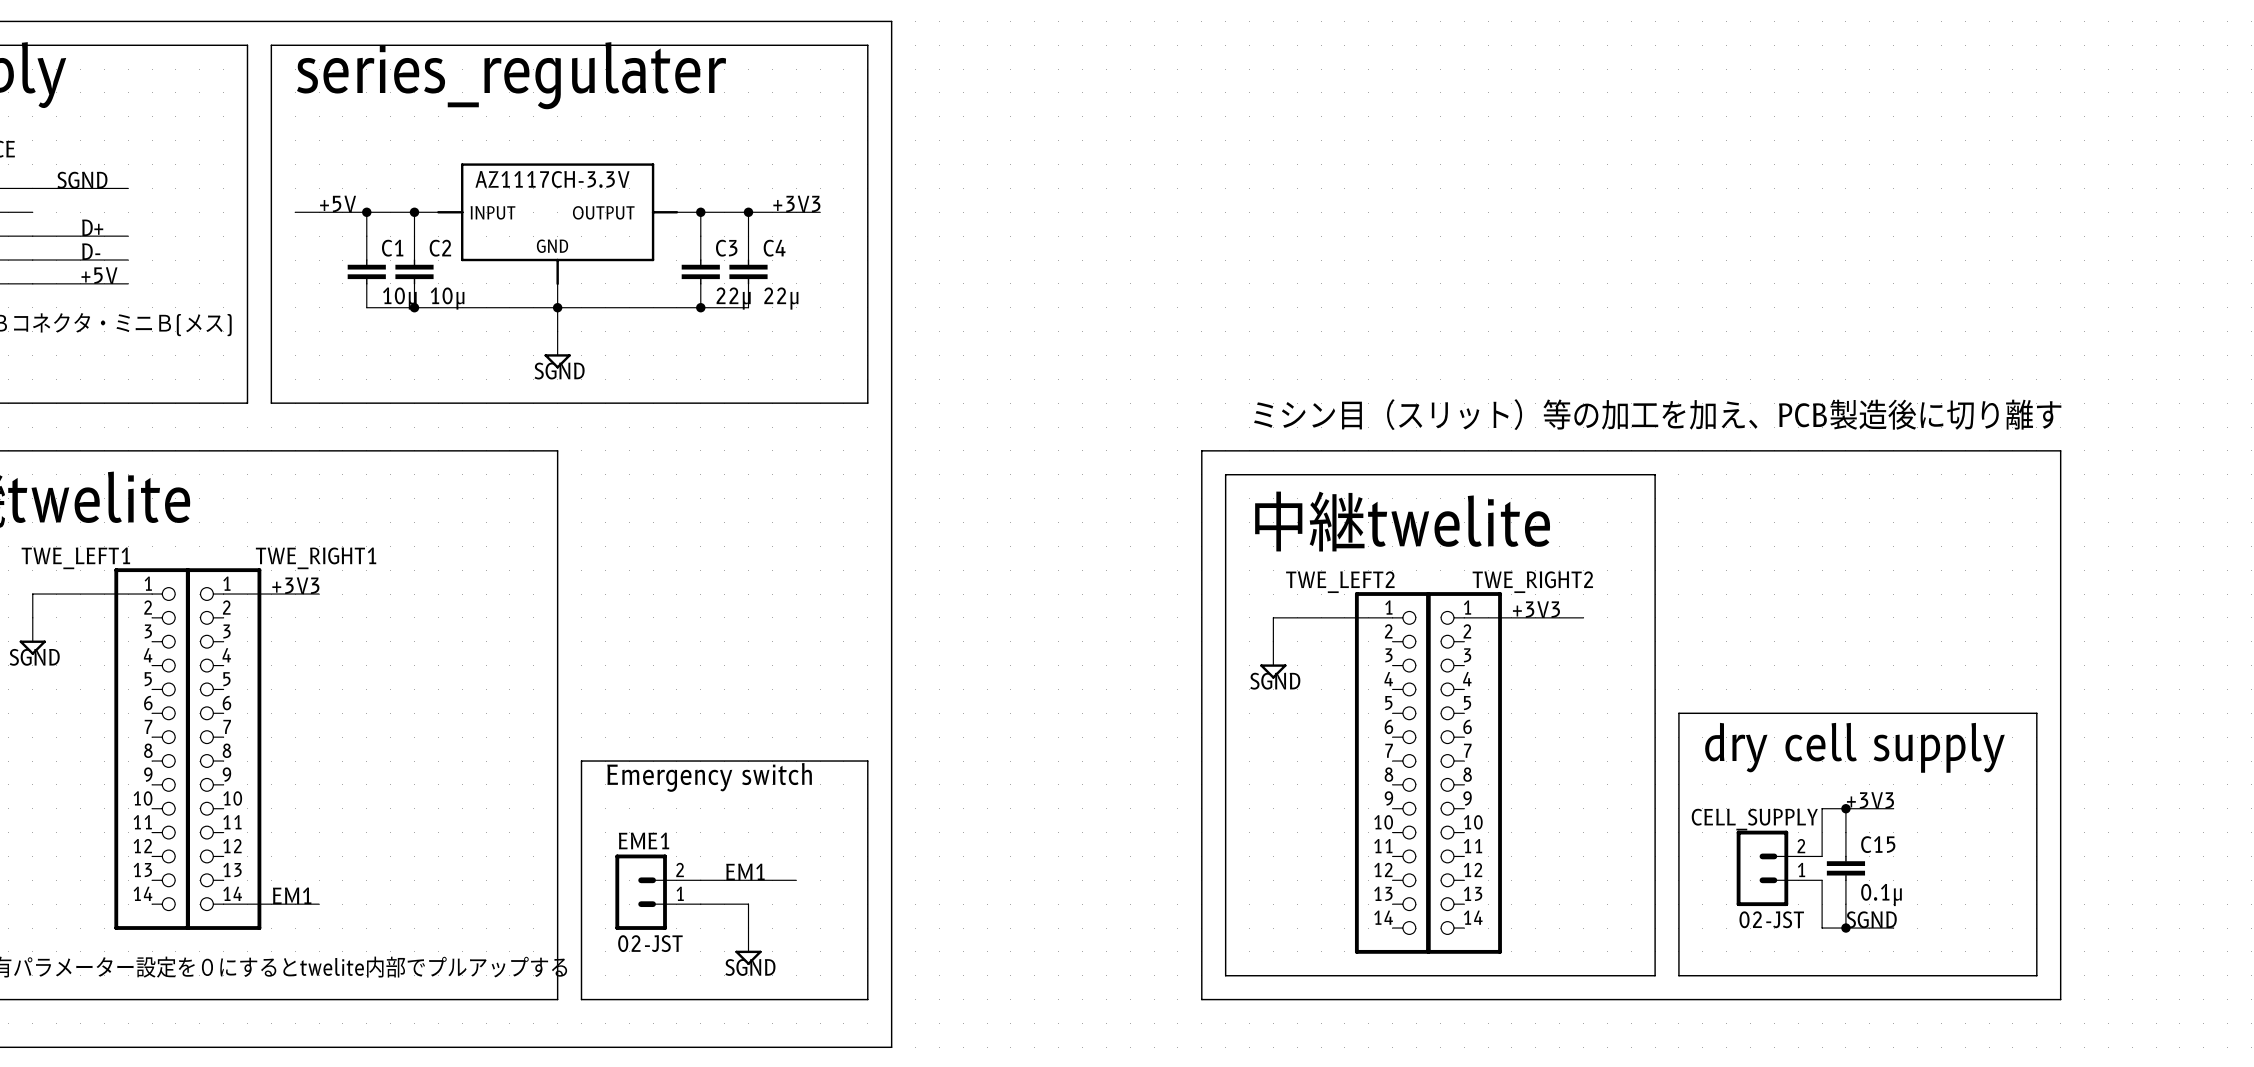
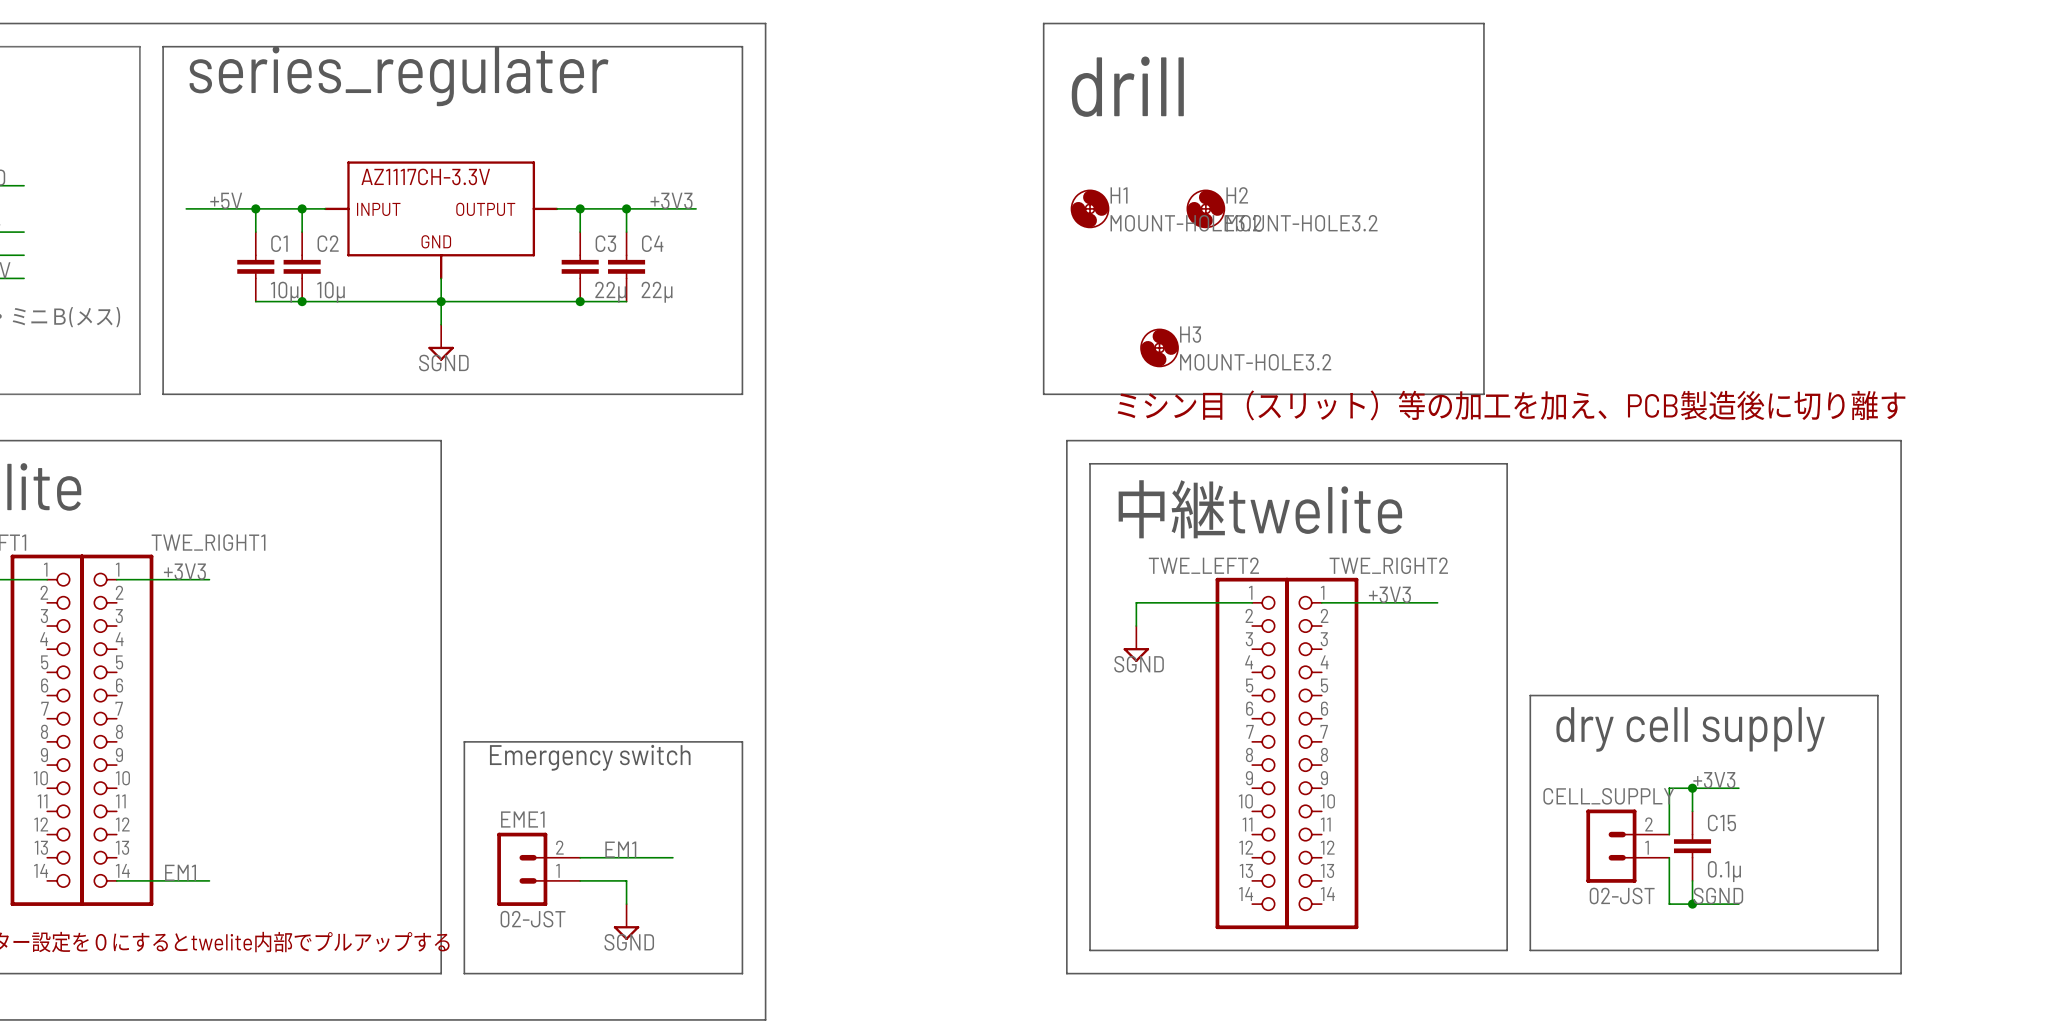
line: none -> (1043, 23) (1043, 394) (1483, 394) (1483, 23) (1043, 23)
text: none -> drill (1127, 86)
H1: none -> MOUNT-HOLE3.2 (1090, 208)
H2: none -> MOUNT-HOLE3.2 (1205, 208)
H3: none -> MOUNT-HOLE3.2 (1159, 347)

